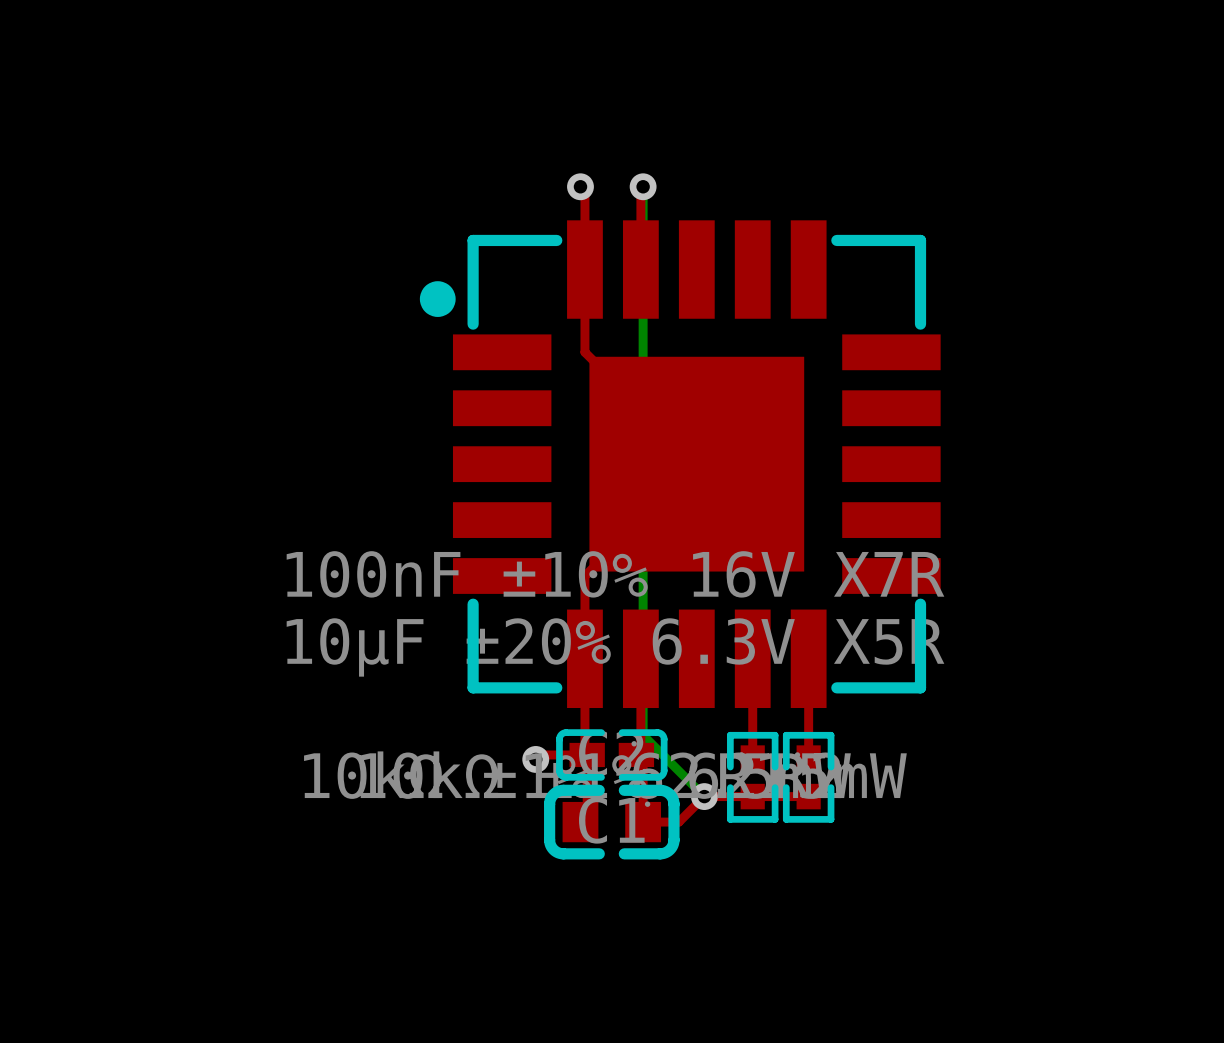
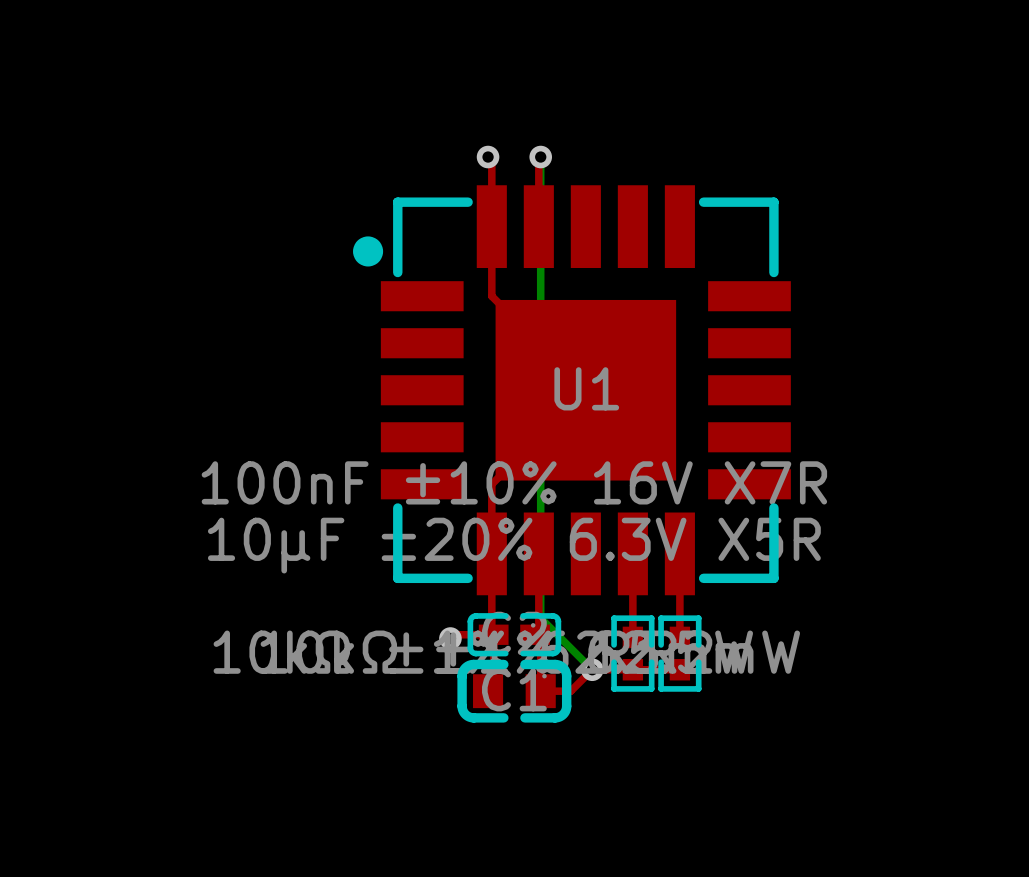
U1 name: none -> U1 (586, 388)

